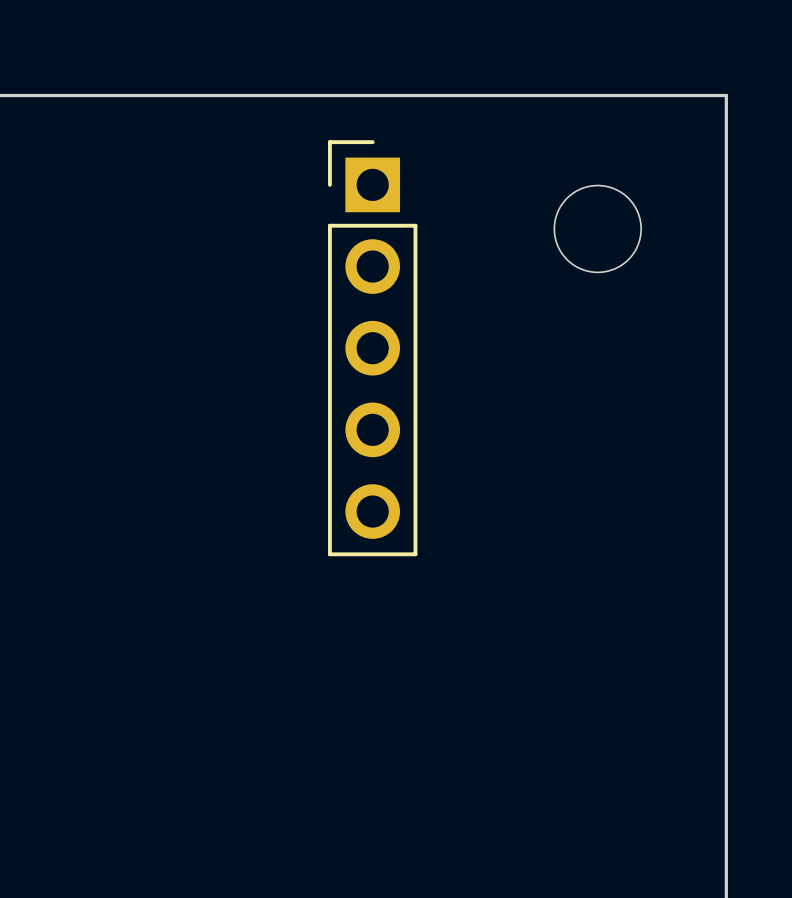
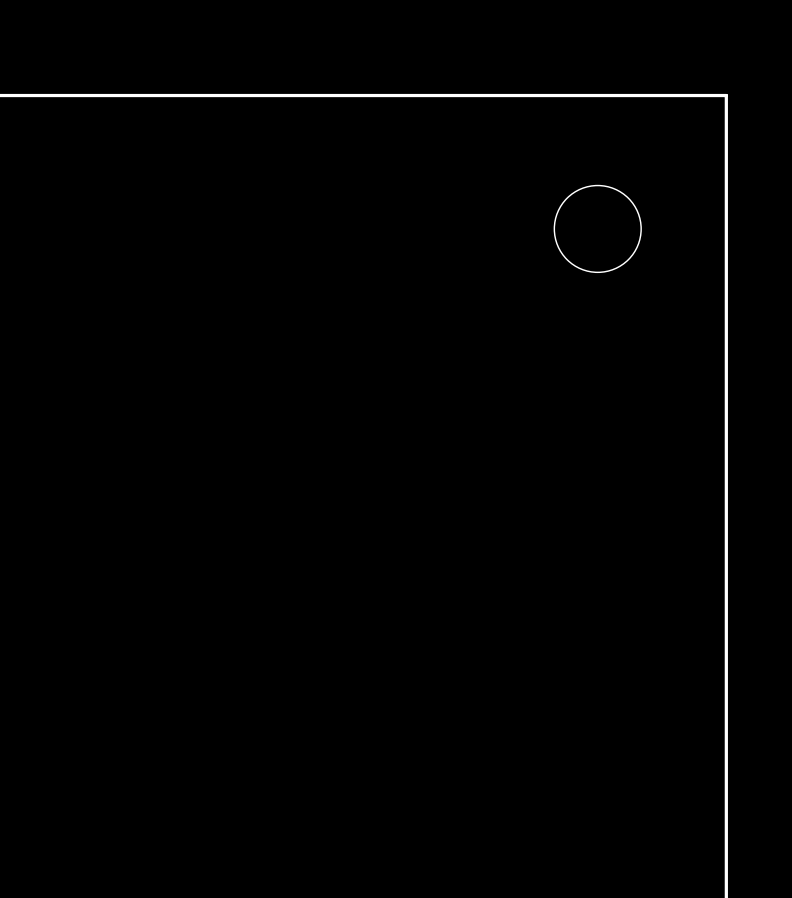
part: (372, 348) -> none

